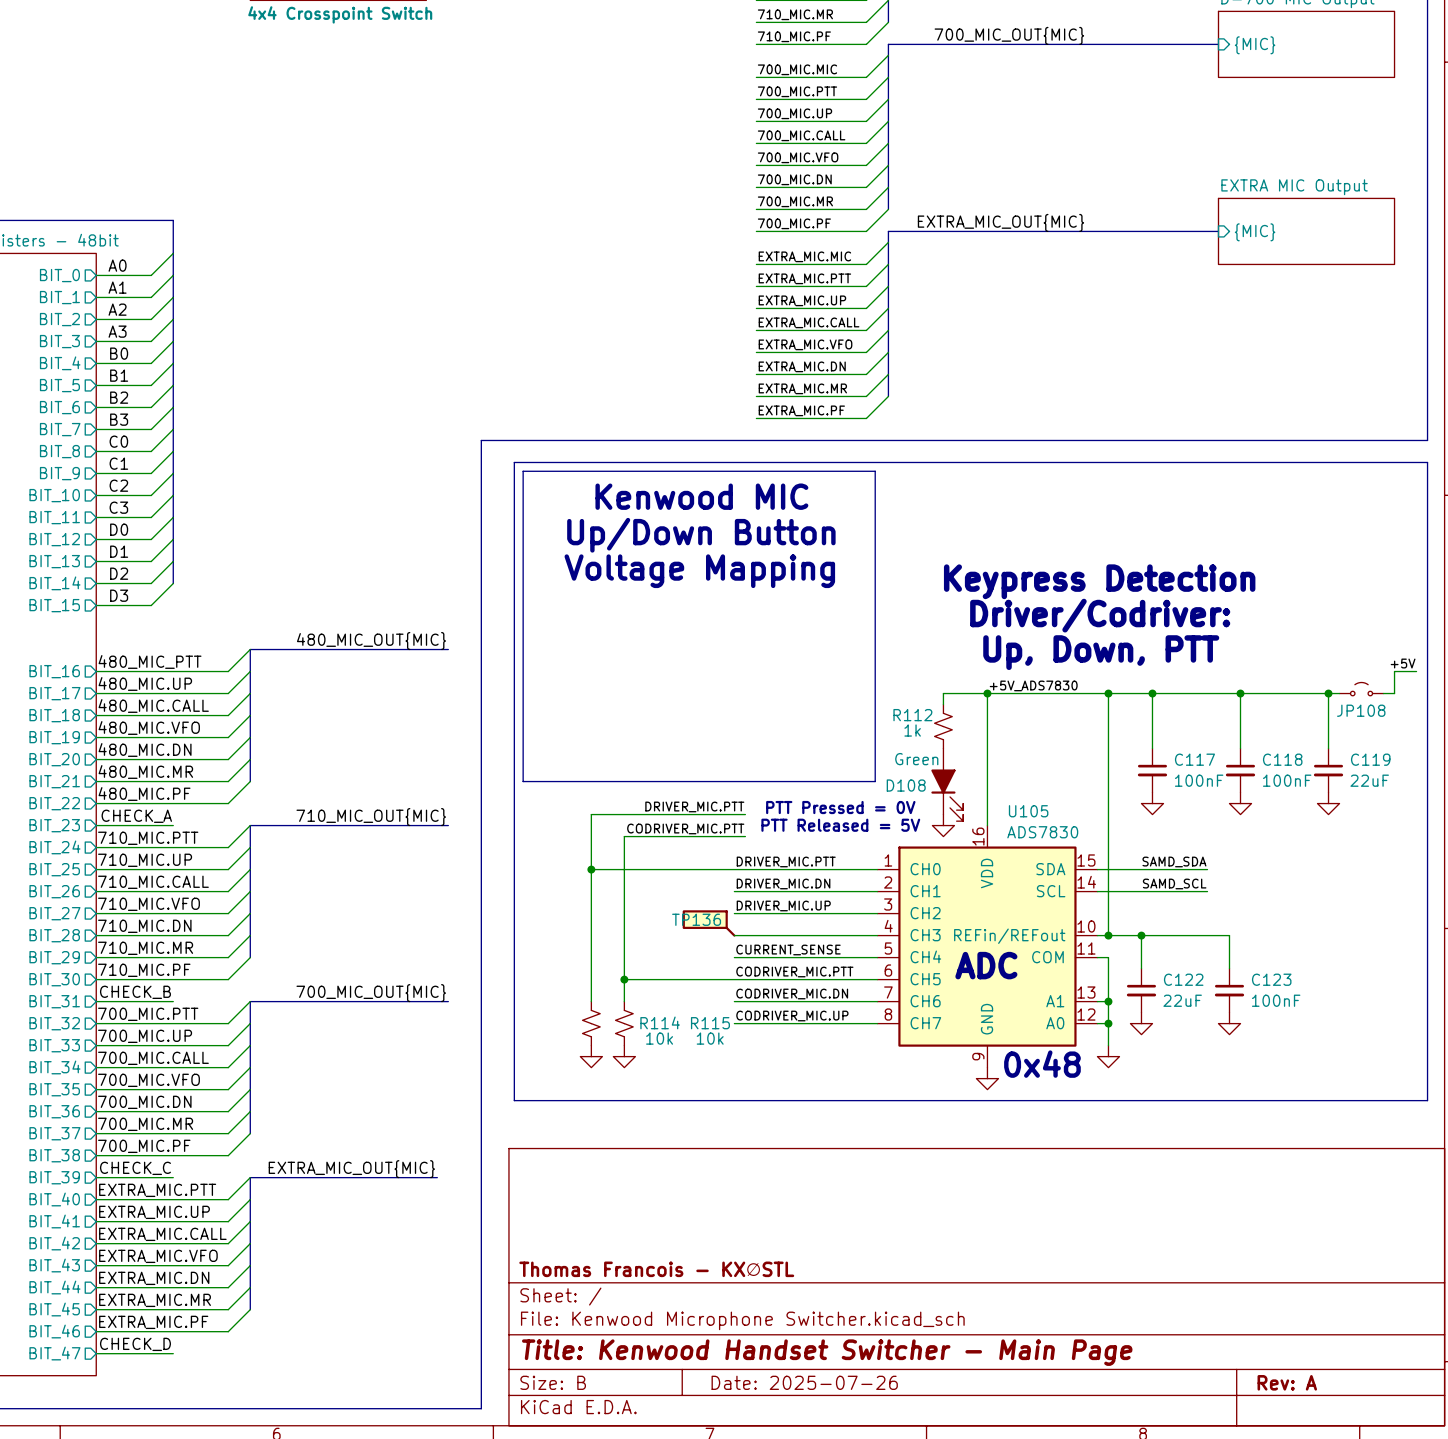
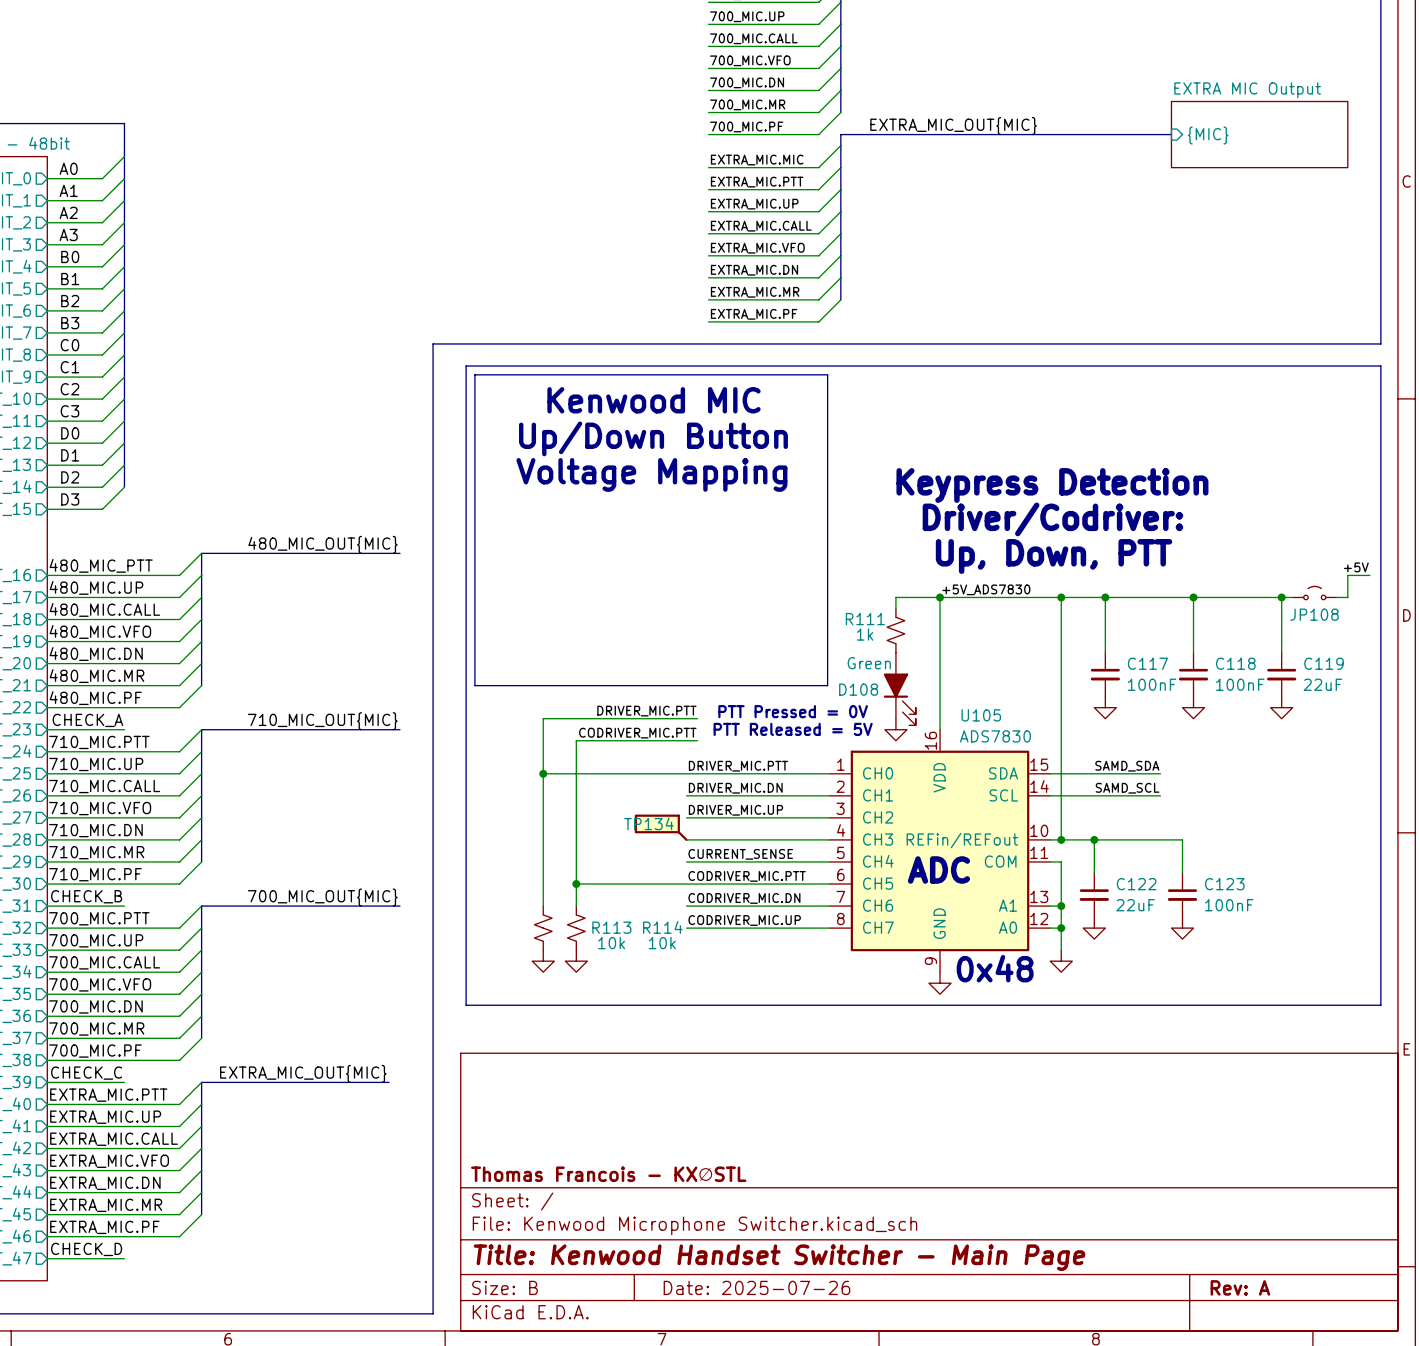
R112 name: R112 (912, 715) -> R111 (865, 619)
TP136 name: TP136 (696, 919) -> TP134 (648, 823)
R114 name: R114 (660, 1022) -> R113 (611, 927)
R115 name: R115 (710, 1023) -> R114 (662, 927)

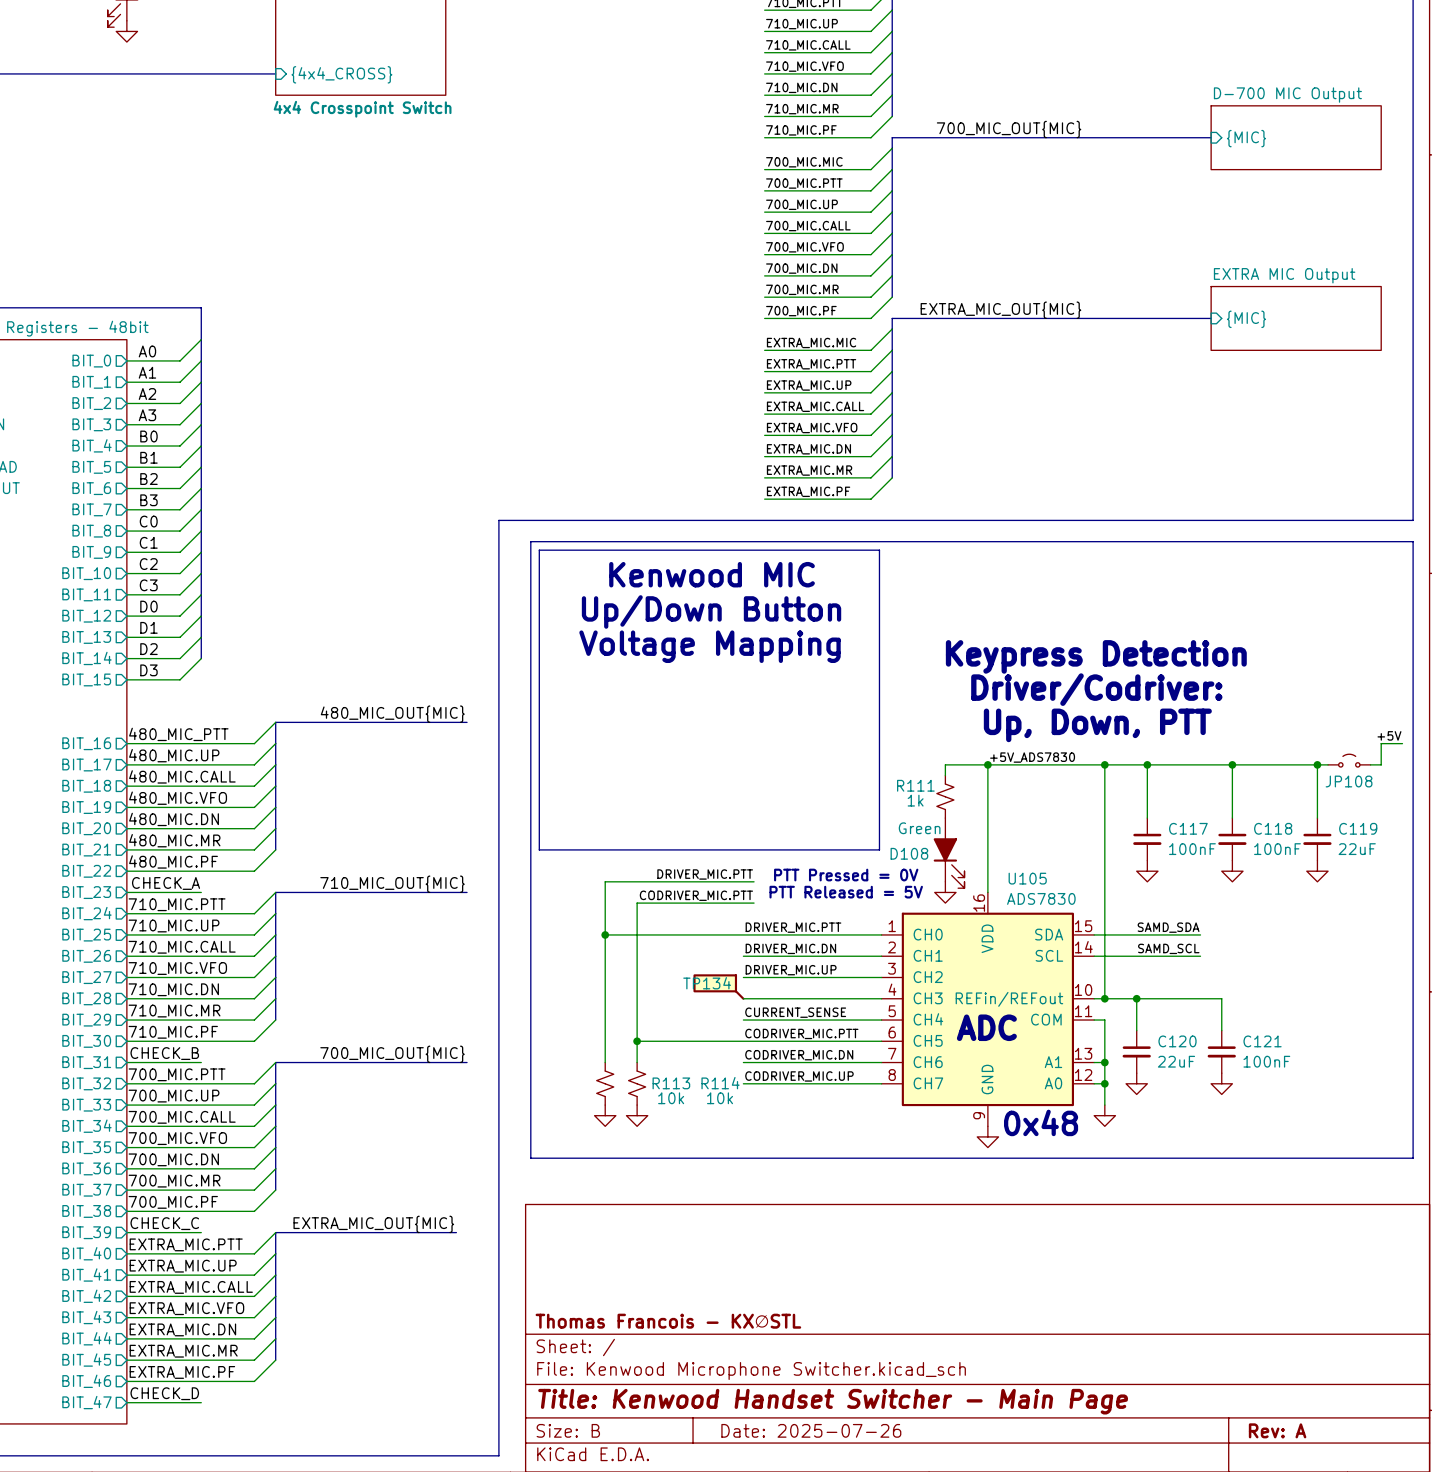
C122 name: C122 (1136, 884) -> C120 (1177, 1041)
C123 name: C123 (1224, 884) -> C121 (1262, 1041)

